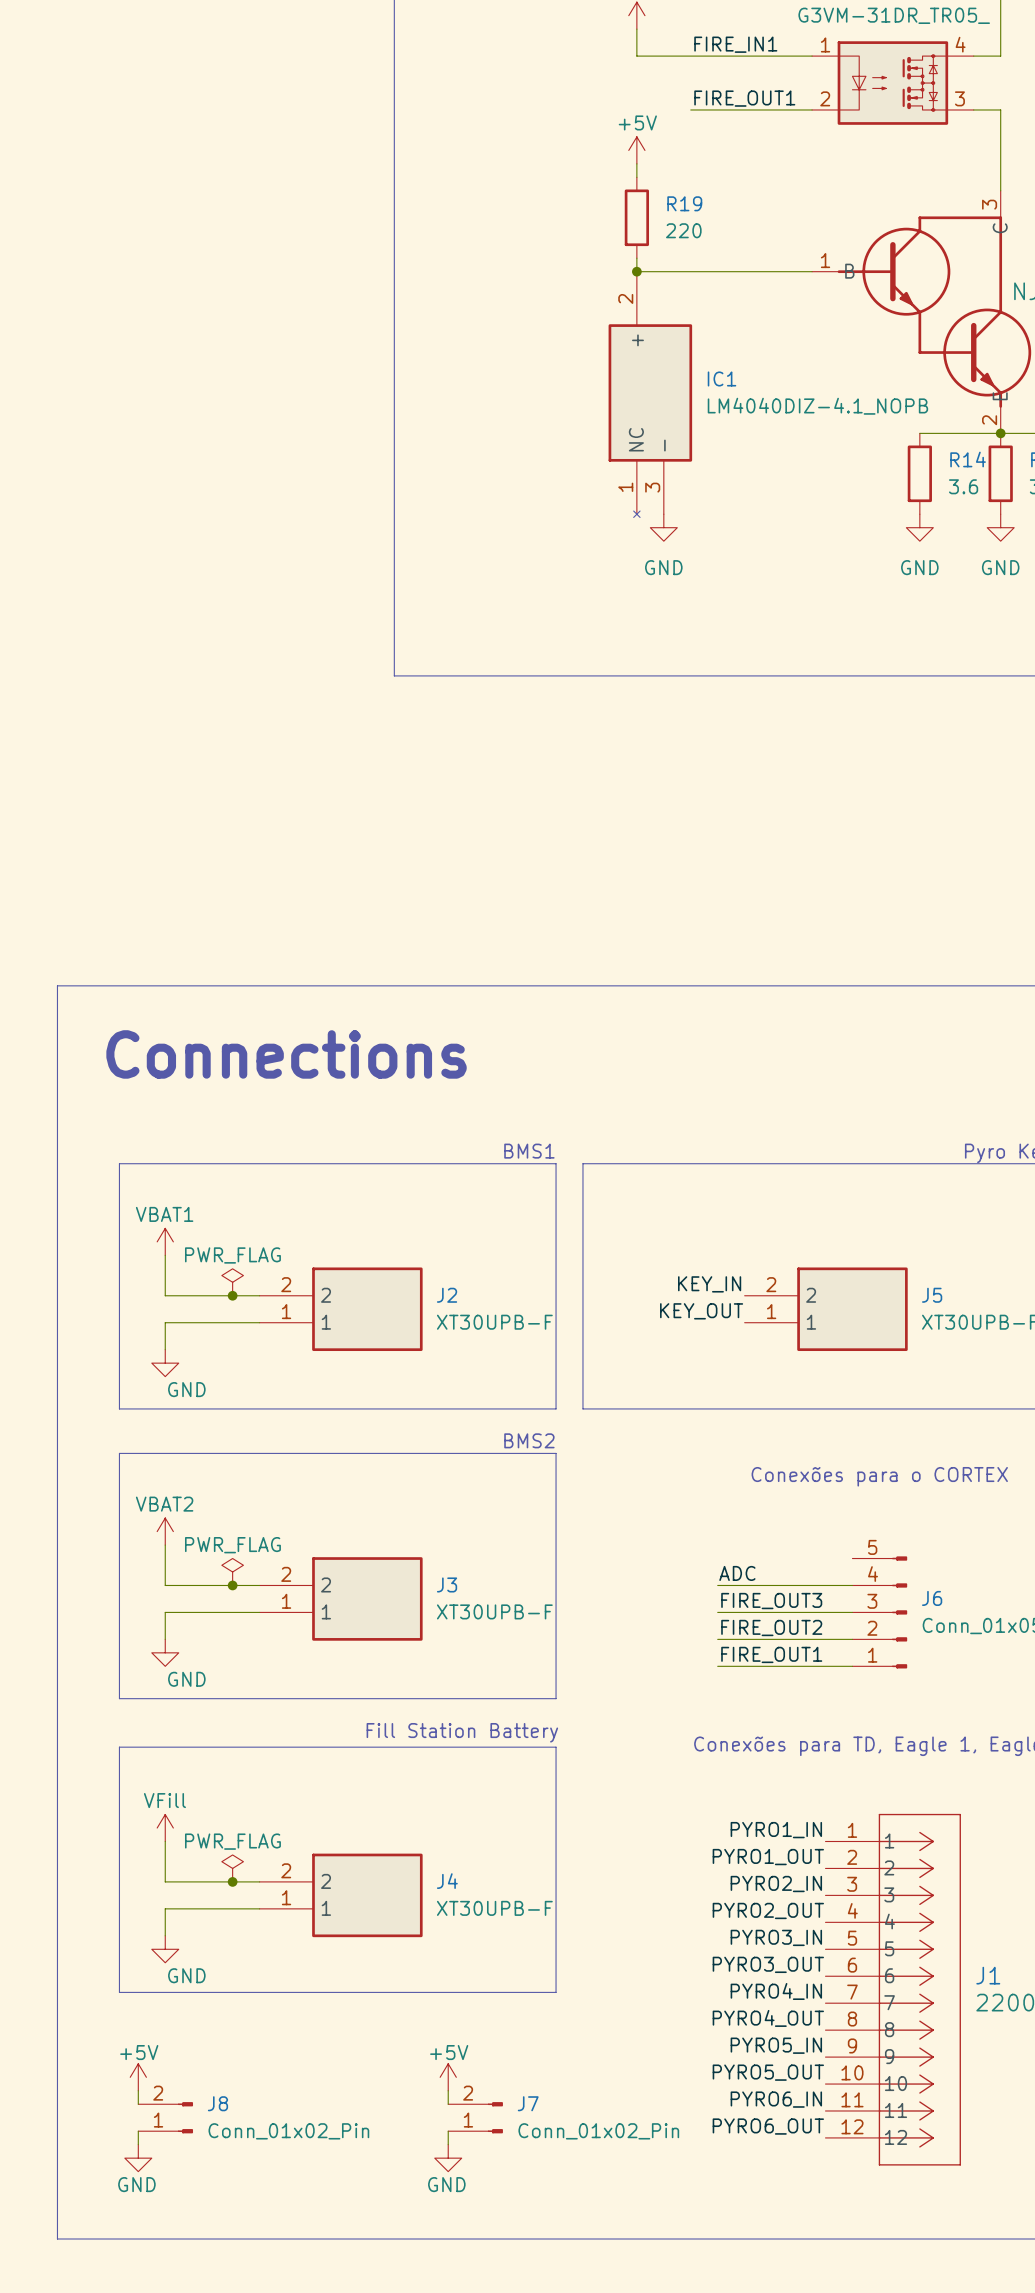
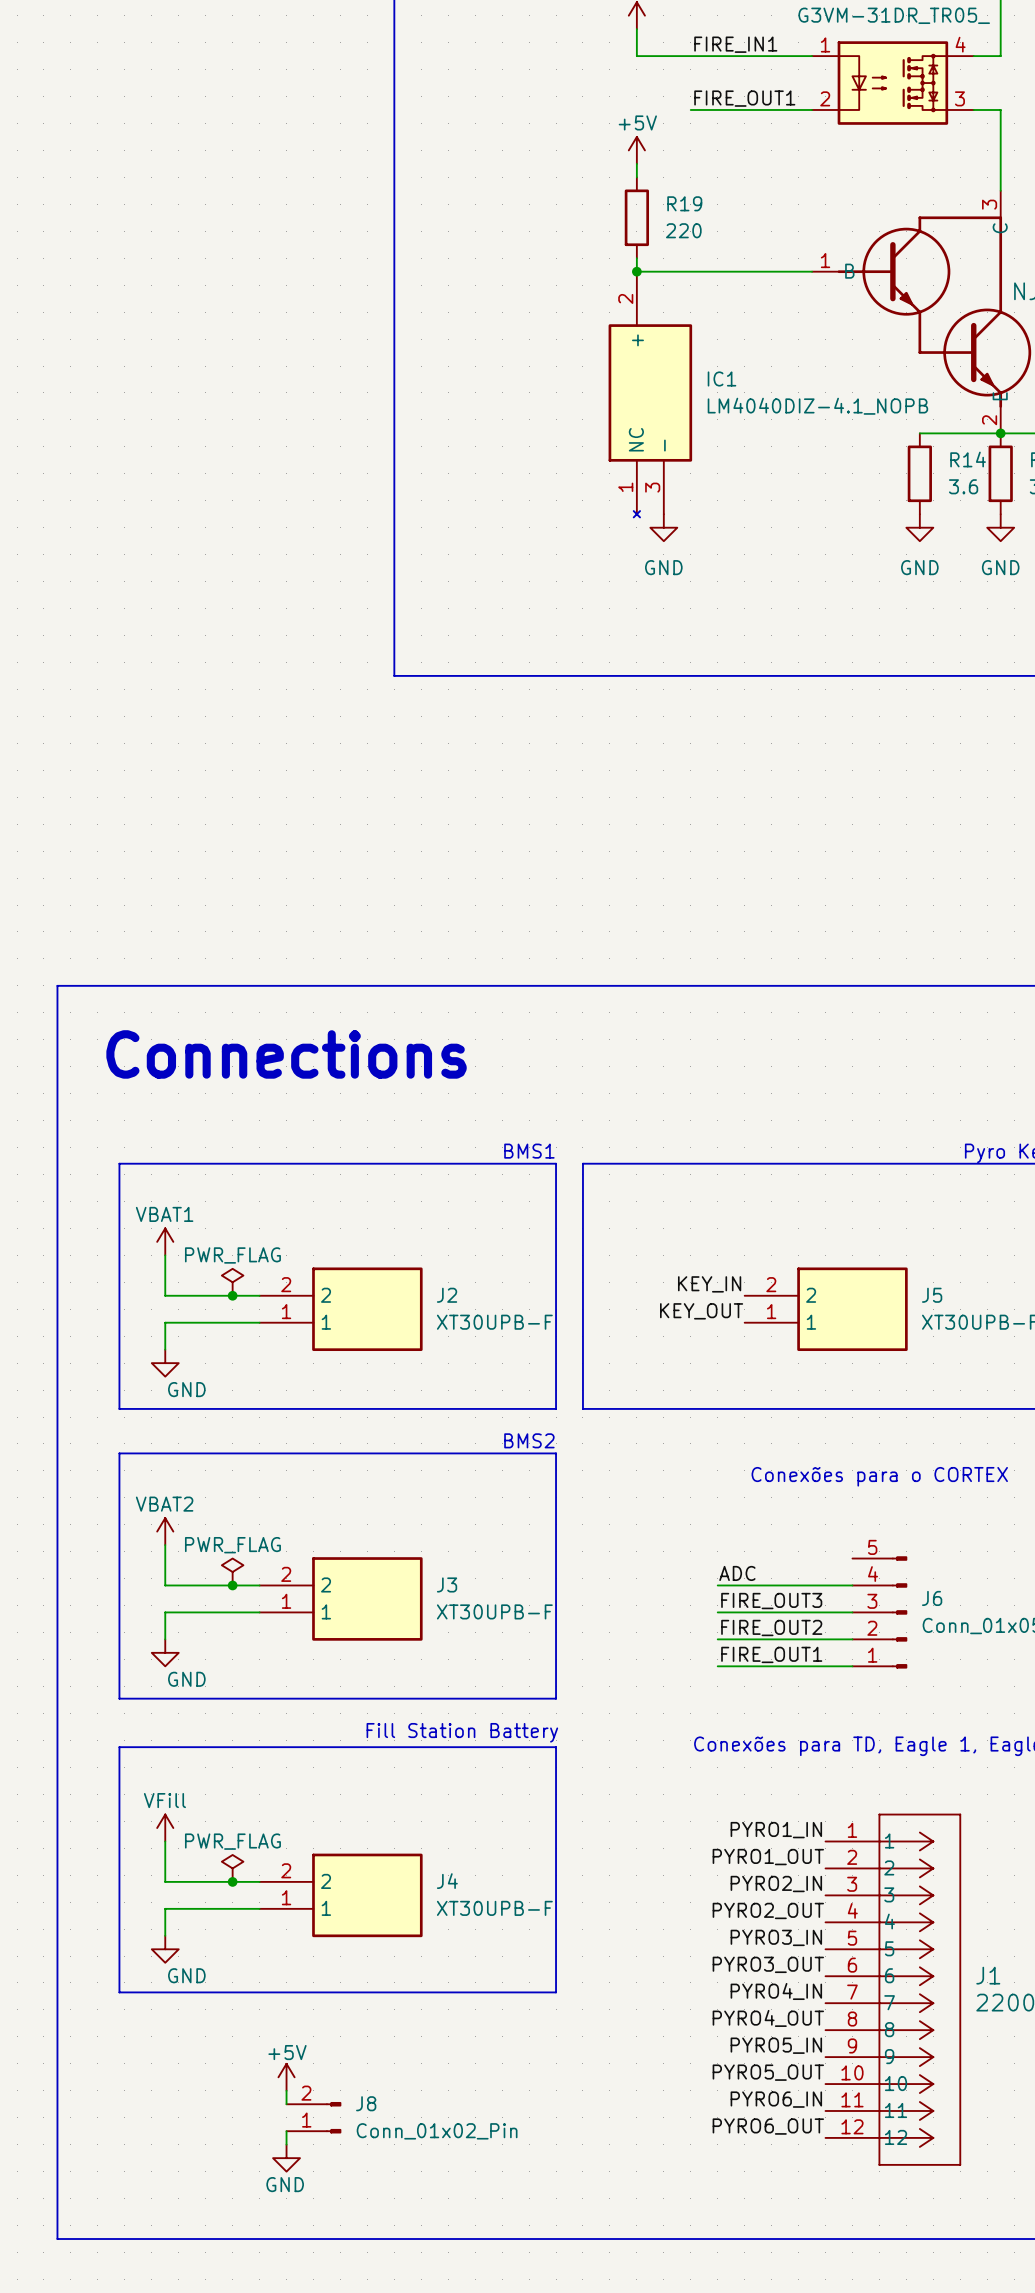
power symbol: +5V (138, 2077) -> none
power symbol: none -> +5V (286, 2077)
power symbol: +5V (448, 2077) -> none
wire: (138, 2090) (138, 2104) -> (286, 2090) (286, 2104)
wire: (448, 2090) (448, 2104) -> none
J8 position: (165, 2117) -> (313, 2117)
J7: Conn_01x02_Pin (475, 2117) -> none
wire: (138, 2131) (138, 2144) -> (286, 2131) (286, 2144)
wire: (448, 2131) (448, 2144) -> none
power symbol: GND (138, 2158) -> none
power symbol: none -> GND (286, 2158)
power symbol: GND (448, 2158) -> none

